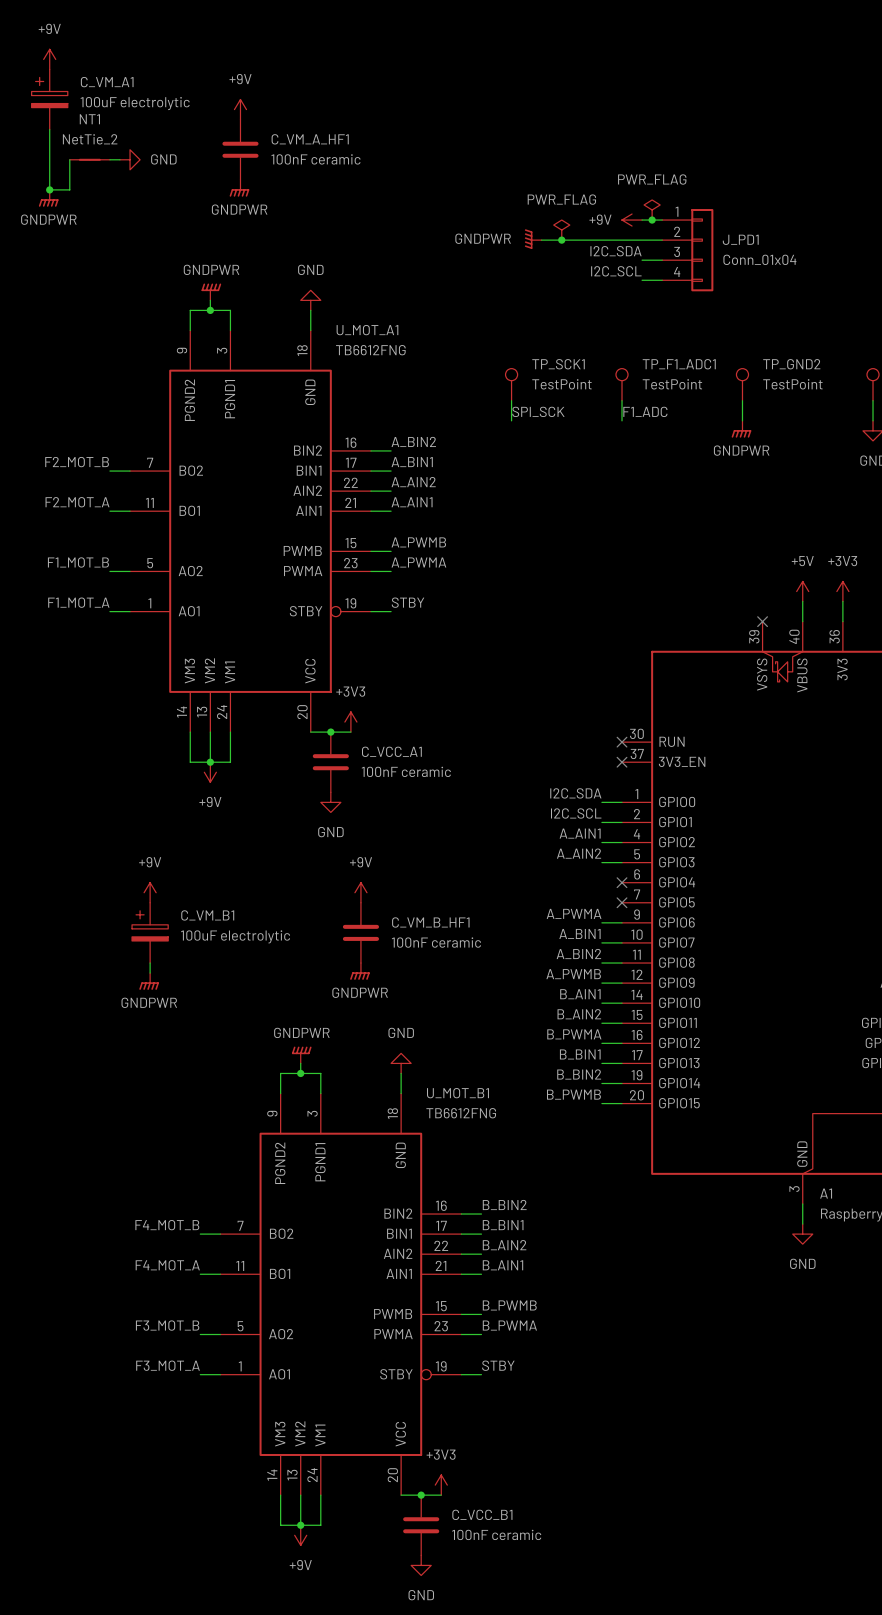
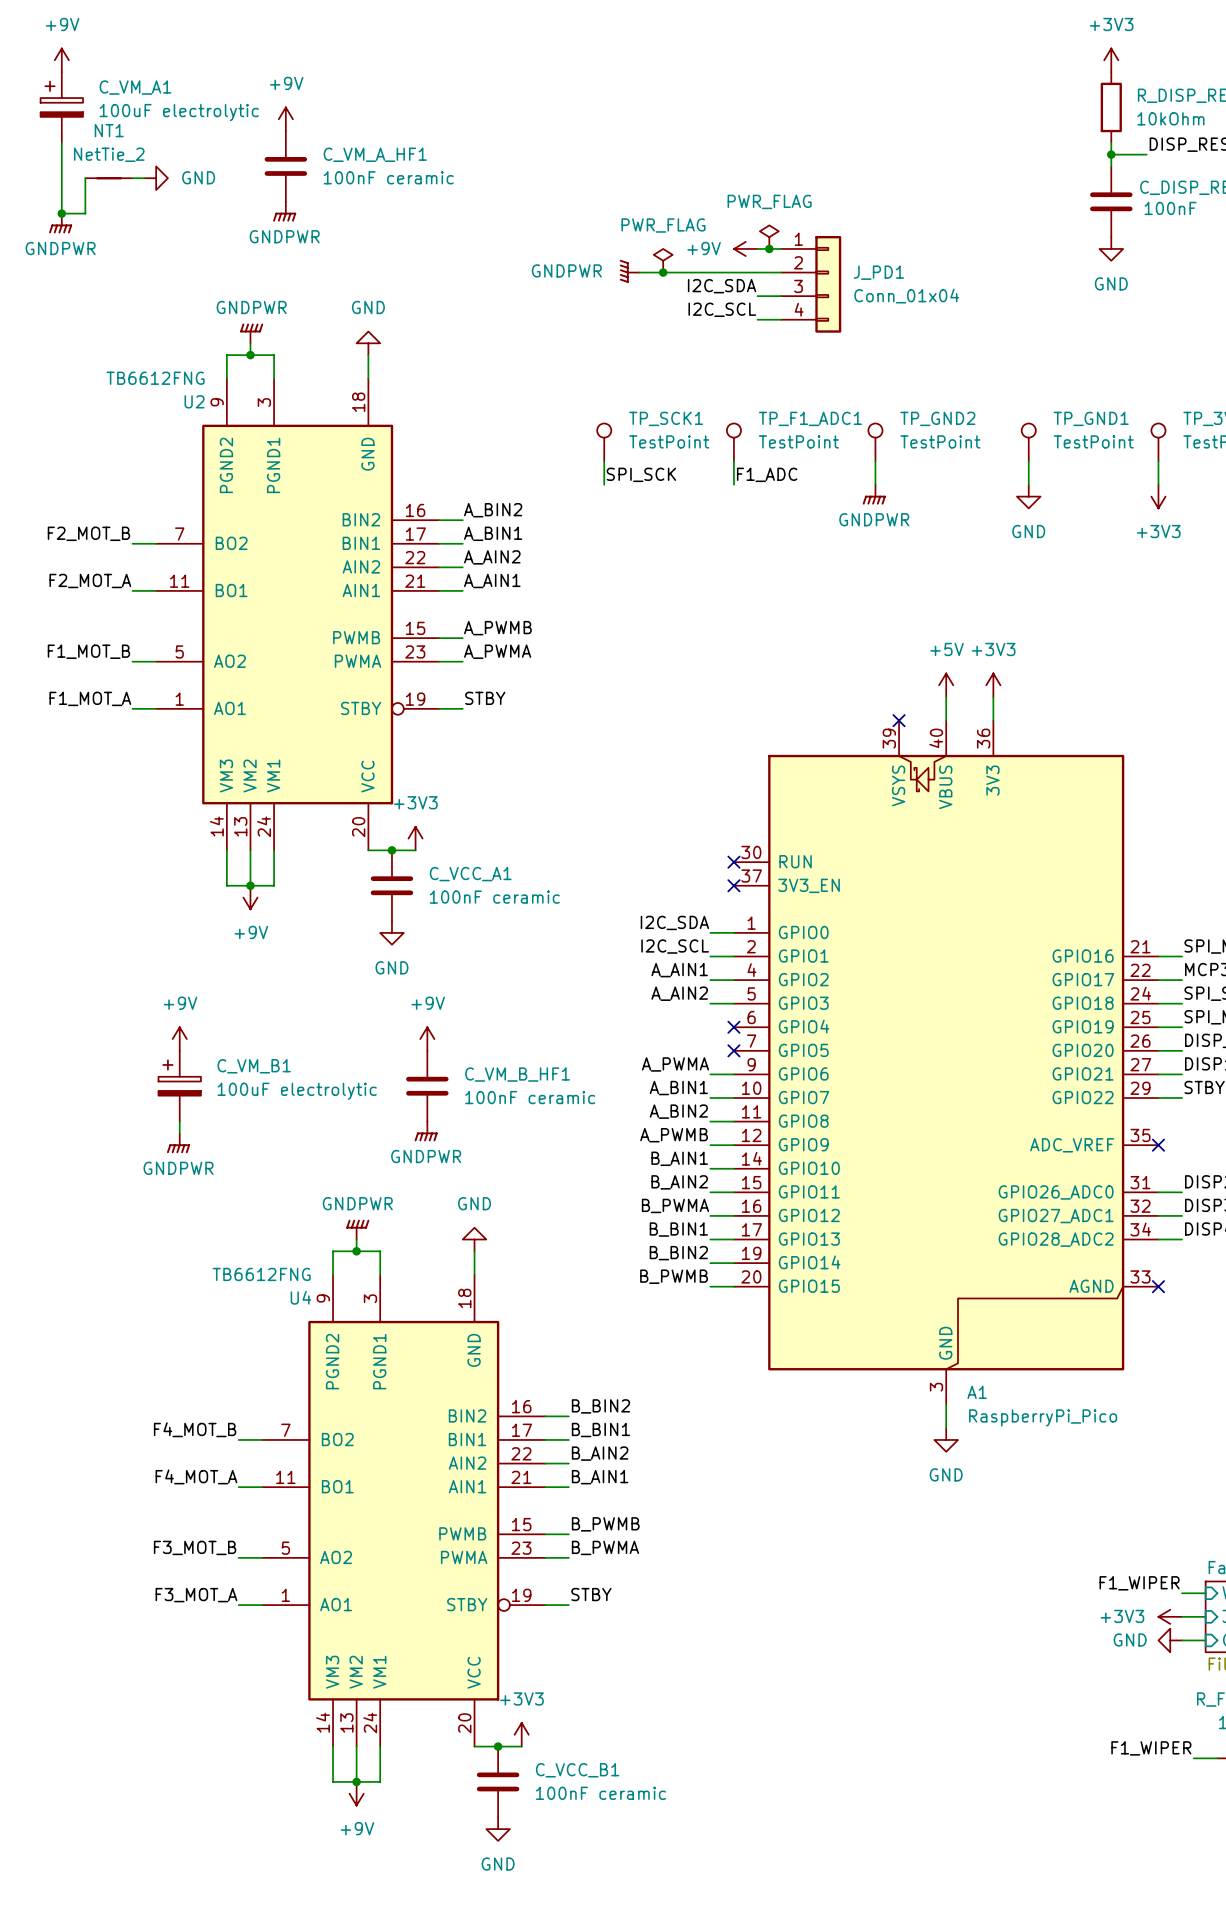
U_MOT_A1 name: U_MOT_A1 (367, 330) -> U2 (194, 401)
U_MOT_A1 value position: TB6612FNG (370, 350) -> TB6612FNG (155, 378)
U_MOT_B1 name: U_MOT_B1 (457, 1093) -> U4 (300, 1297)
U_MOT_B1 value position: TB6612FNG (461, 1113) -> TB6612FNG (261, 1274)

